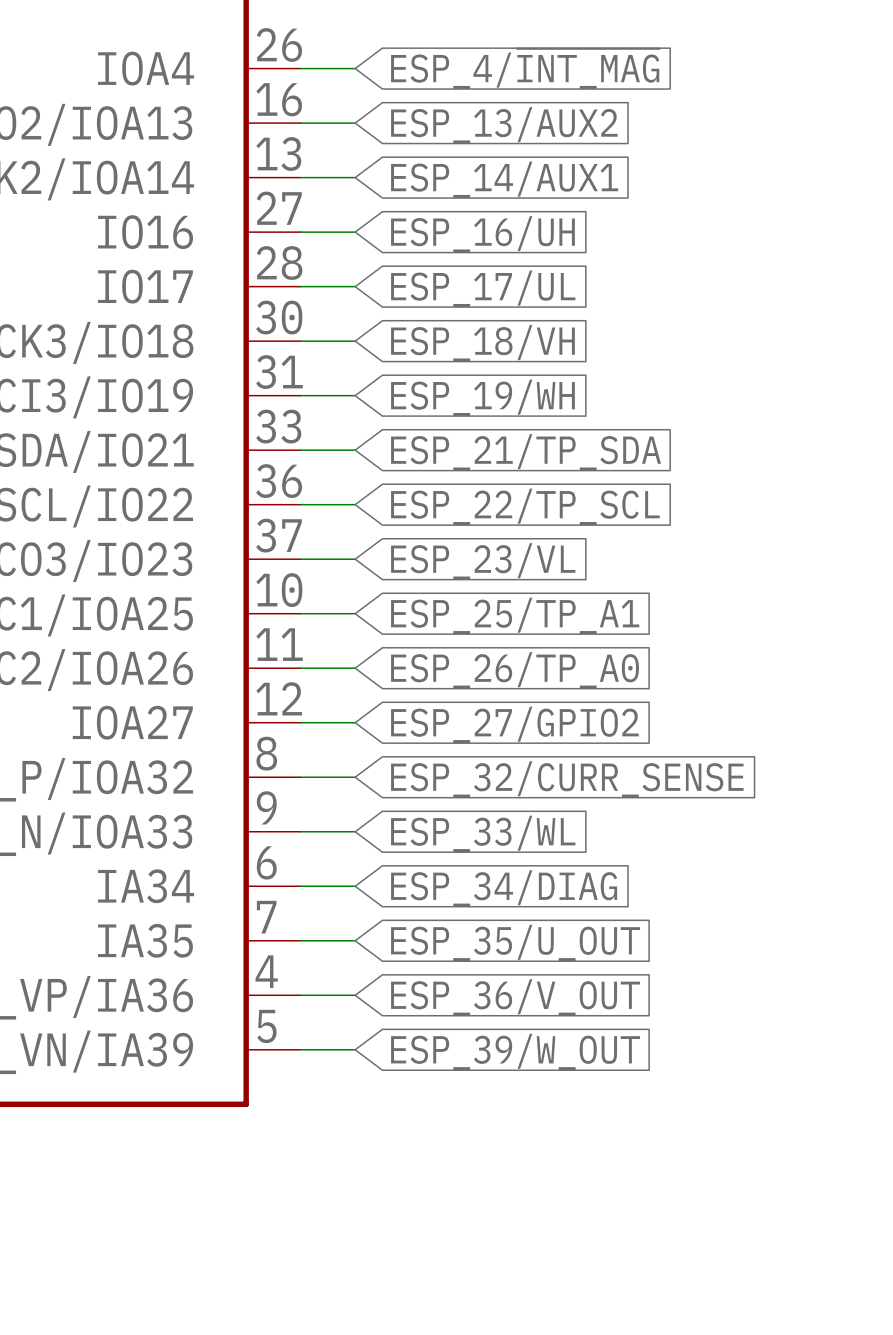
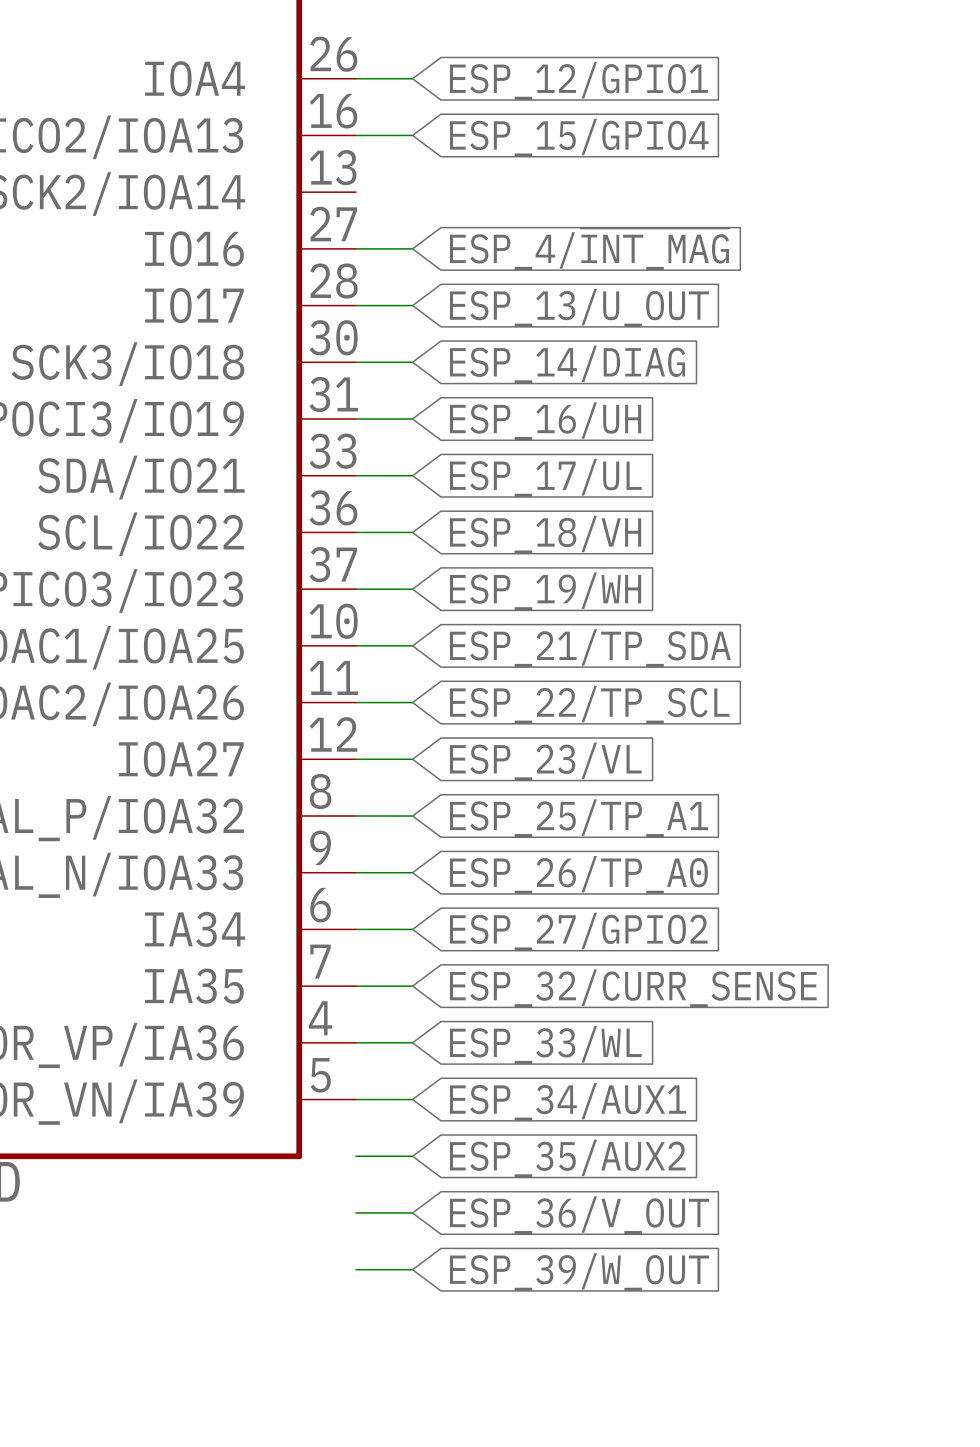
global label: ESP_4/~{INT_MAG} (525, 68) -> ESP_12/GPIO1 (579, 80)
global label: ESP_13/AUX2 (504, 125) -> ESP_15/GPIO4 (579, 137)
wire: (300, 177) (355, 177) -> none
global label: ESP_14/AUX1 (504, 179) -> none
global label: ESP_16/UH (482, 234) -> ESP_4/~{INT_MAG} (589, 249)
global label: ESP_17/UL (483, 288) -> ESP_13/U_OUT (579, 307)
global label: ESP_18/VH (482, 343) -> ESP_14/DIAG (567, 364)
global label: ESP_19/WH (482, 397) -> ESP_16/UH (545, 421)
global label: ESP_21/TP_SDA (526, 452) -> ESP_17/UL (545, 477)
global label: ESP_22/TP_SCL (525, 506) -> ESP_18/VH (545, 534)
global label: ESP_23/VL (483, 561) -> ESP_19/WH (545, 591)
global label: ESP_25/TP_A1 (515, 615) -> ESP_21/TP_SDA (590, 648)
global label: ESP_26/TP_A0 (515, 670) -> ESP_22/TP_SCL (589, 704)
global label: ESP_27/GPIO2 (514, 724) -> ESP_23/VL (545, 761)
global label: ESP_32/CURR_SENSE (567, 779) -> ESP_25/TP_A1 (579, 818)
global label: ESP_33/WL (483, 833) -> ESP_26/TP_A0 (578, 874)
global label: ESP_34/DIAG (504, 888) -> ESP_27/GPIO2 (578, 931)
global label: ESP_35/U_OUT (515, 942) -> ESP_32/CURR_SENSE (633, 988)
global label: ESP_36/V_OUT (515, 997) -> ESP_33/WL (545, 1045)
global label: ESP_39/W_OUT (515, 1051) -> ESP_34/AUX1 (568, 1101)
wire: none -> (355, 1156) (412, 1156)
global label: none -> ESP_35/AUX2 (567, 1158)
wire: none -> (355, 1212) (412, 1212)
global label: none -> ESP_36/V_OUT (579, 1215)
wire: none -> (355, 1269) (412, 1269)
global label: none -> ESP_39/W_OUT (579, 1271)

